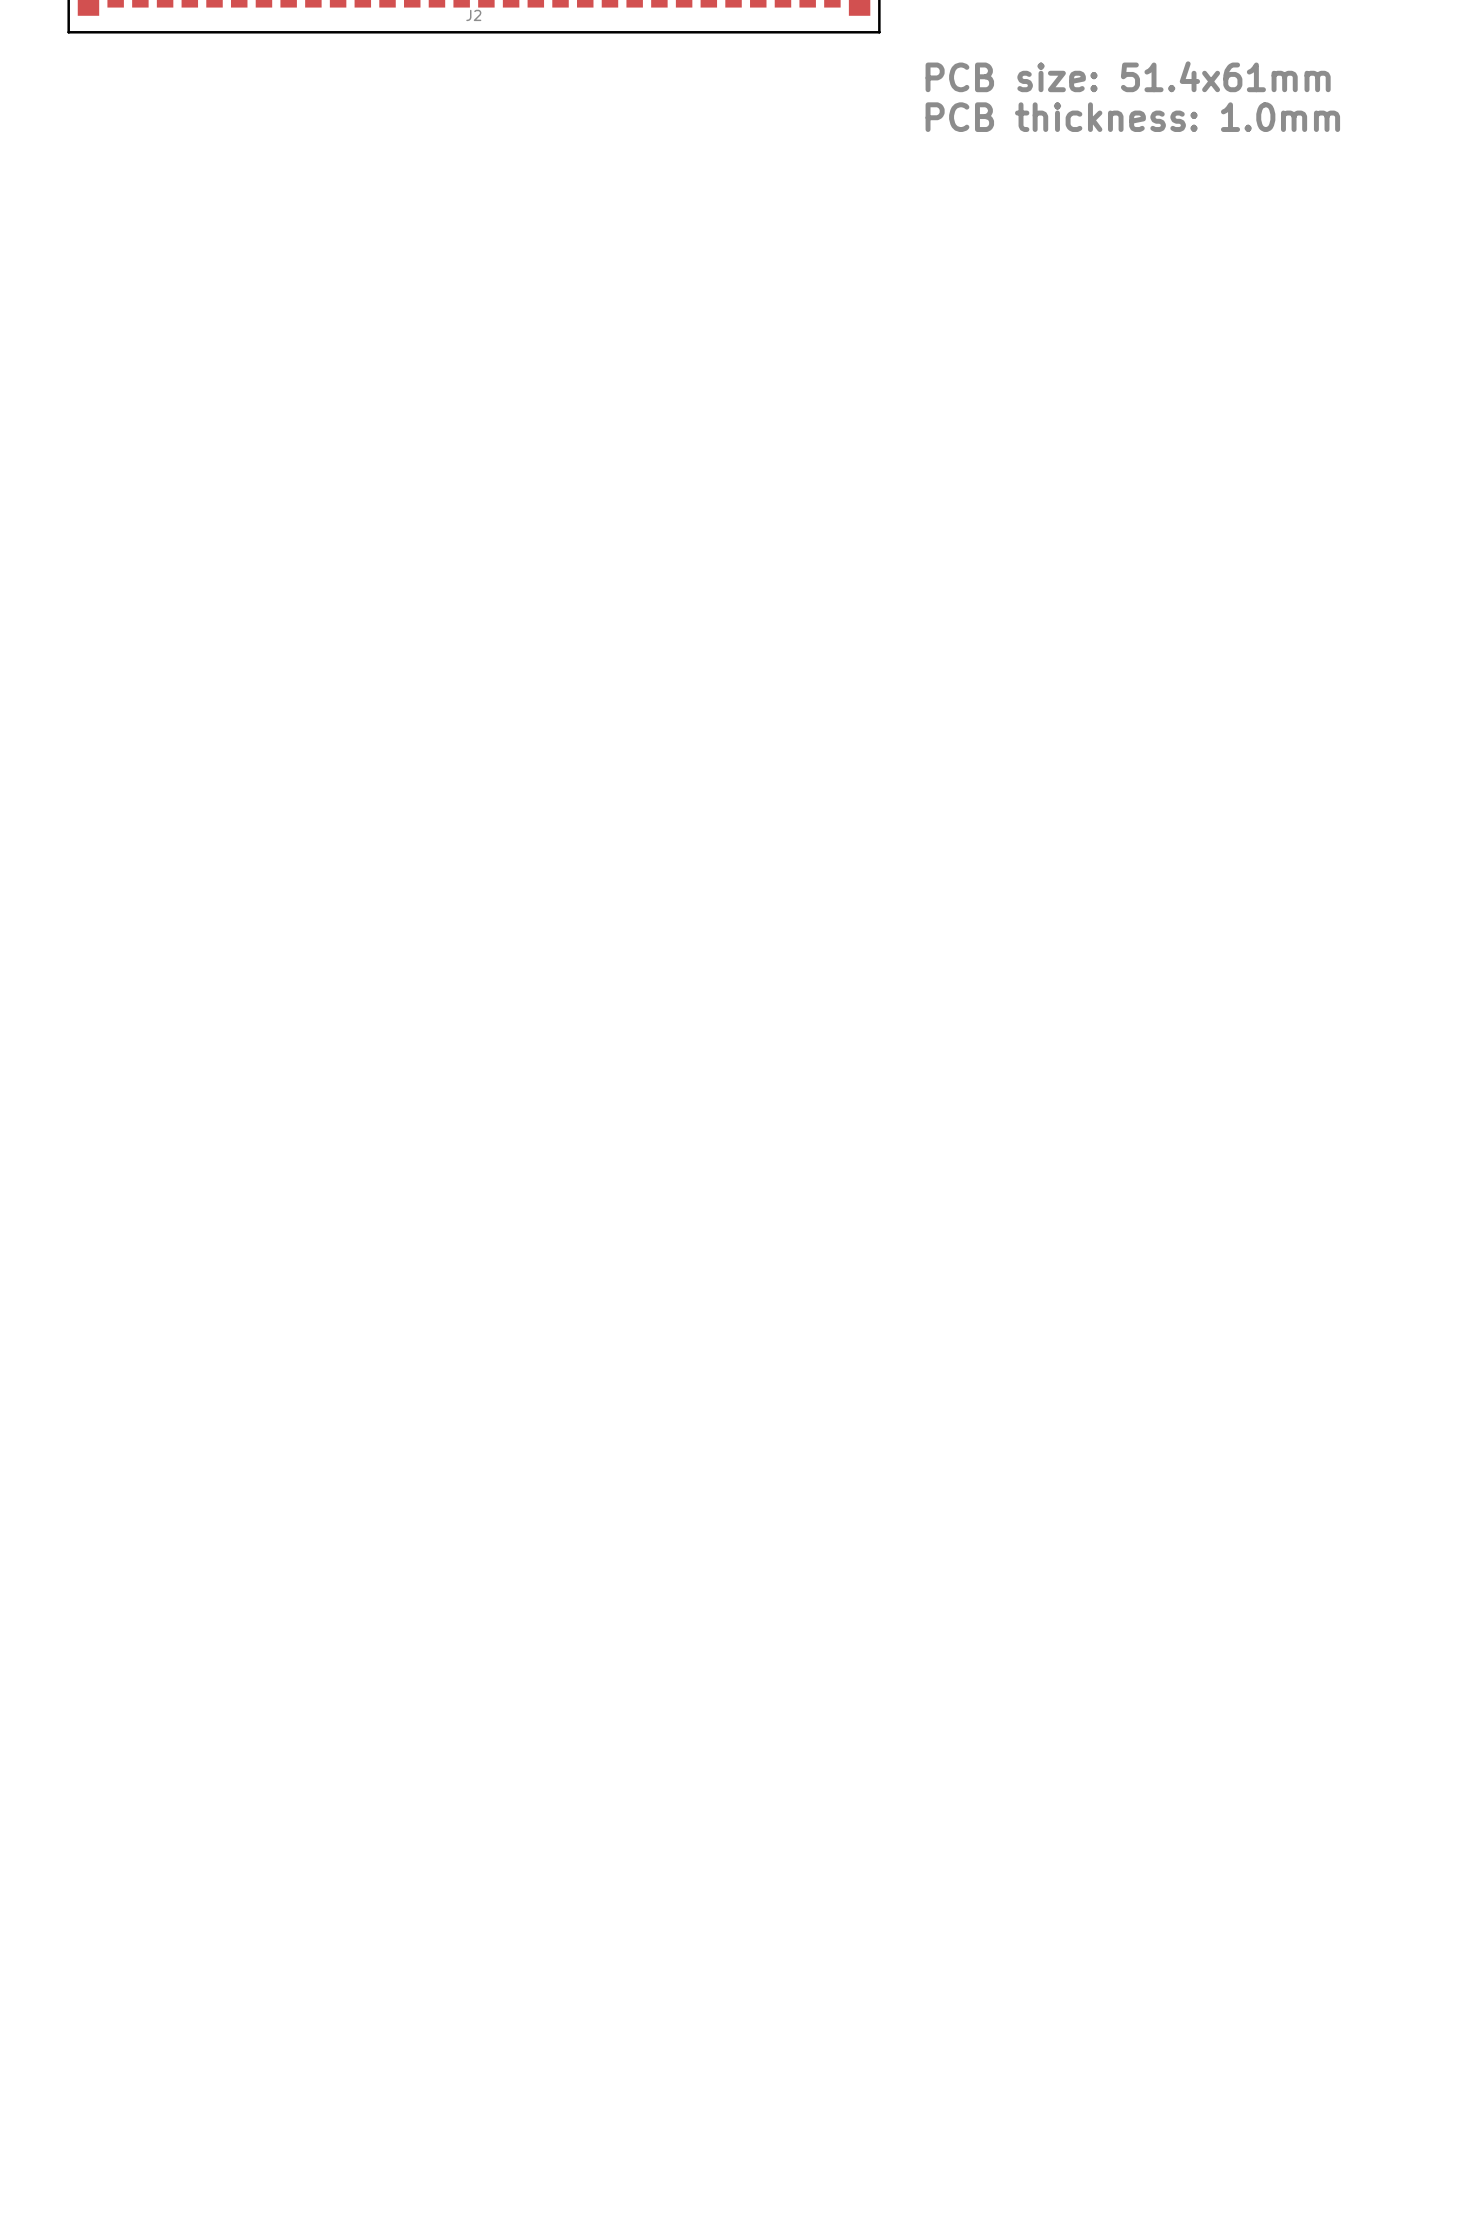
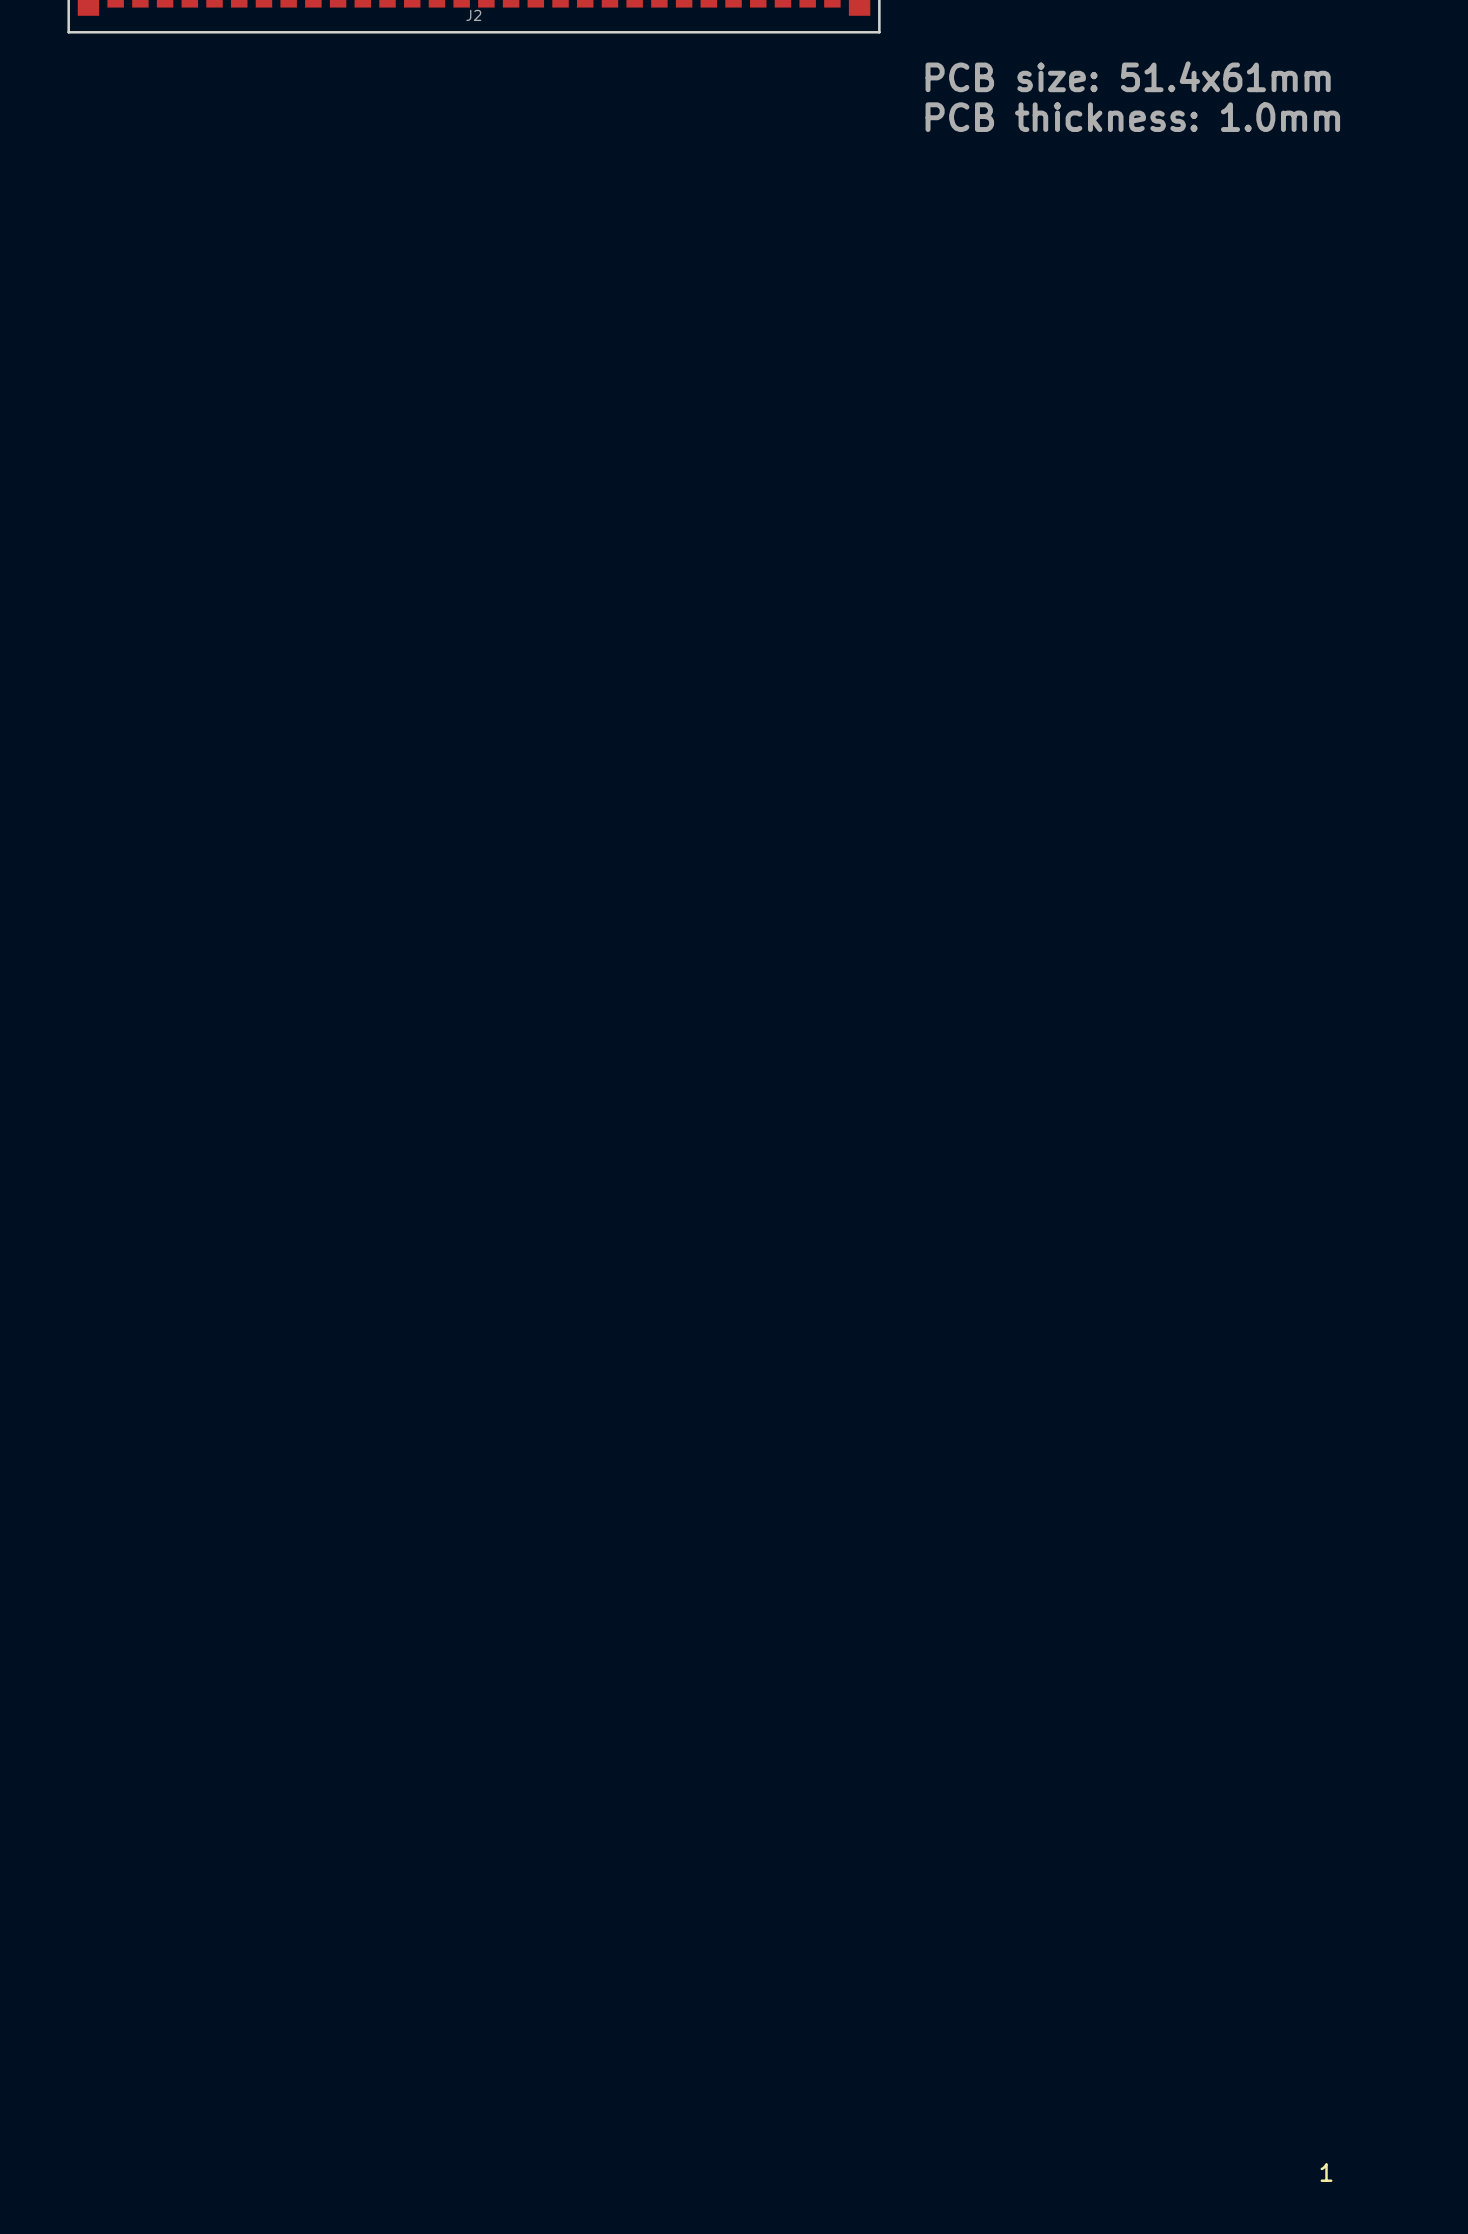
drawing: none -> [1320, 2163, 1333, 2182]

